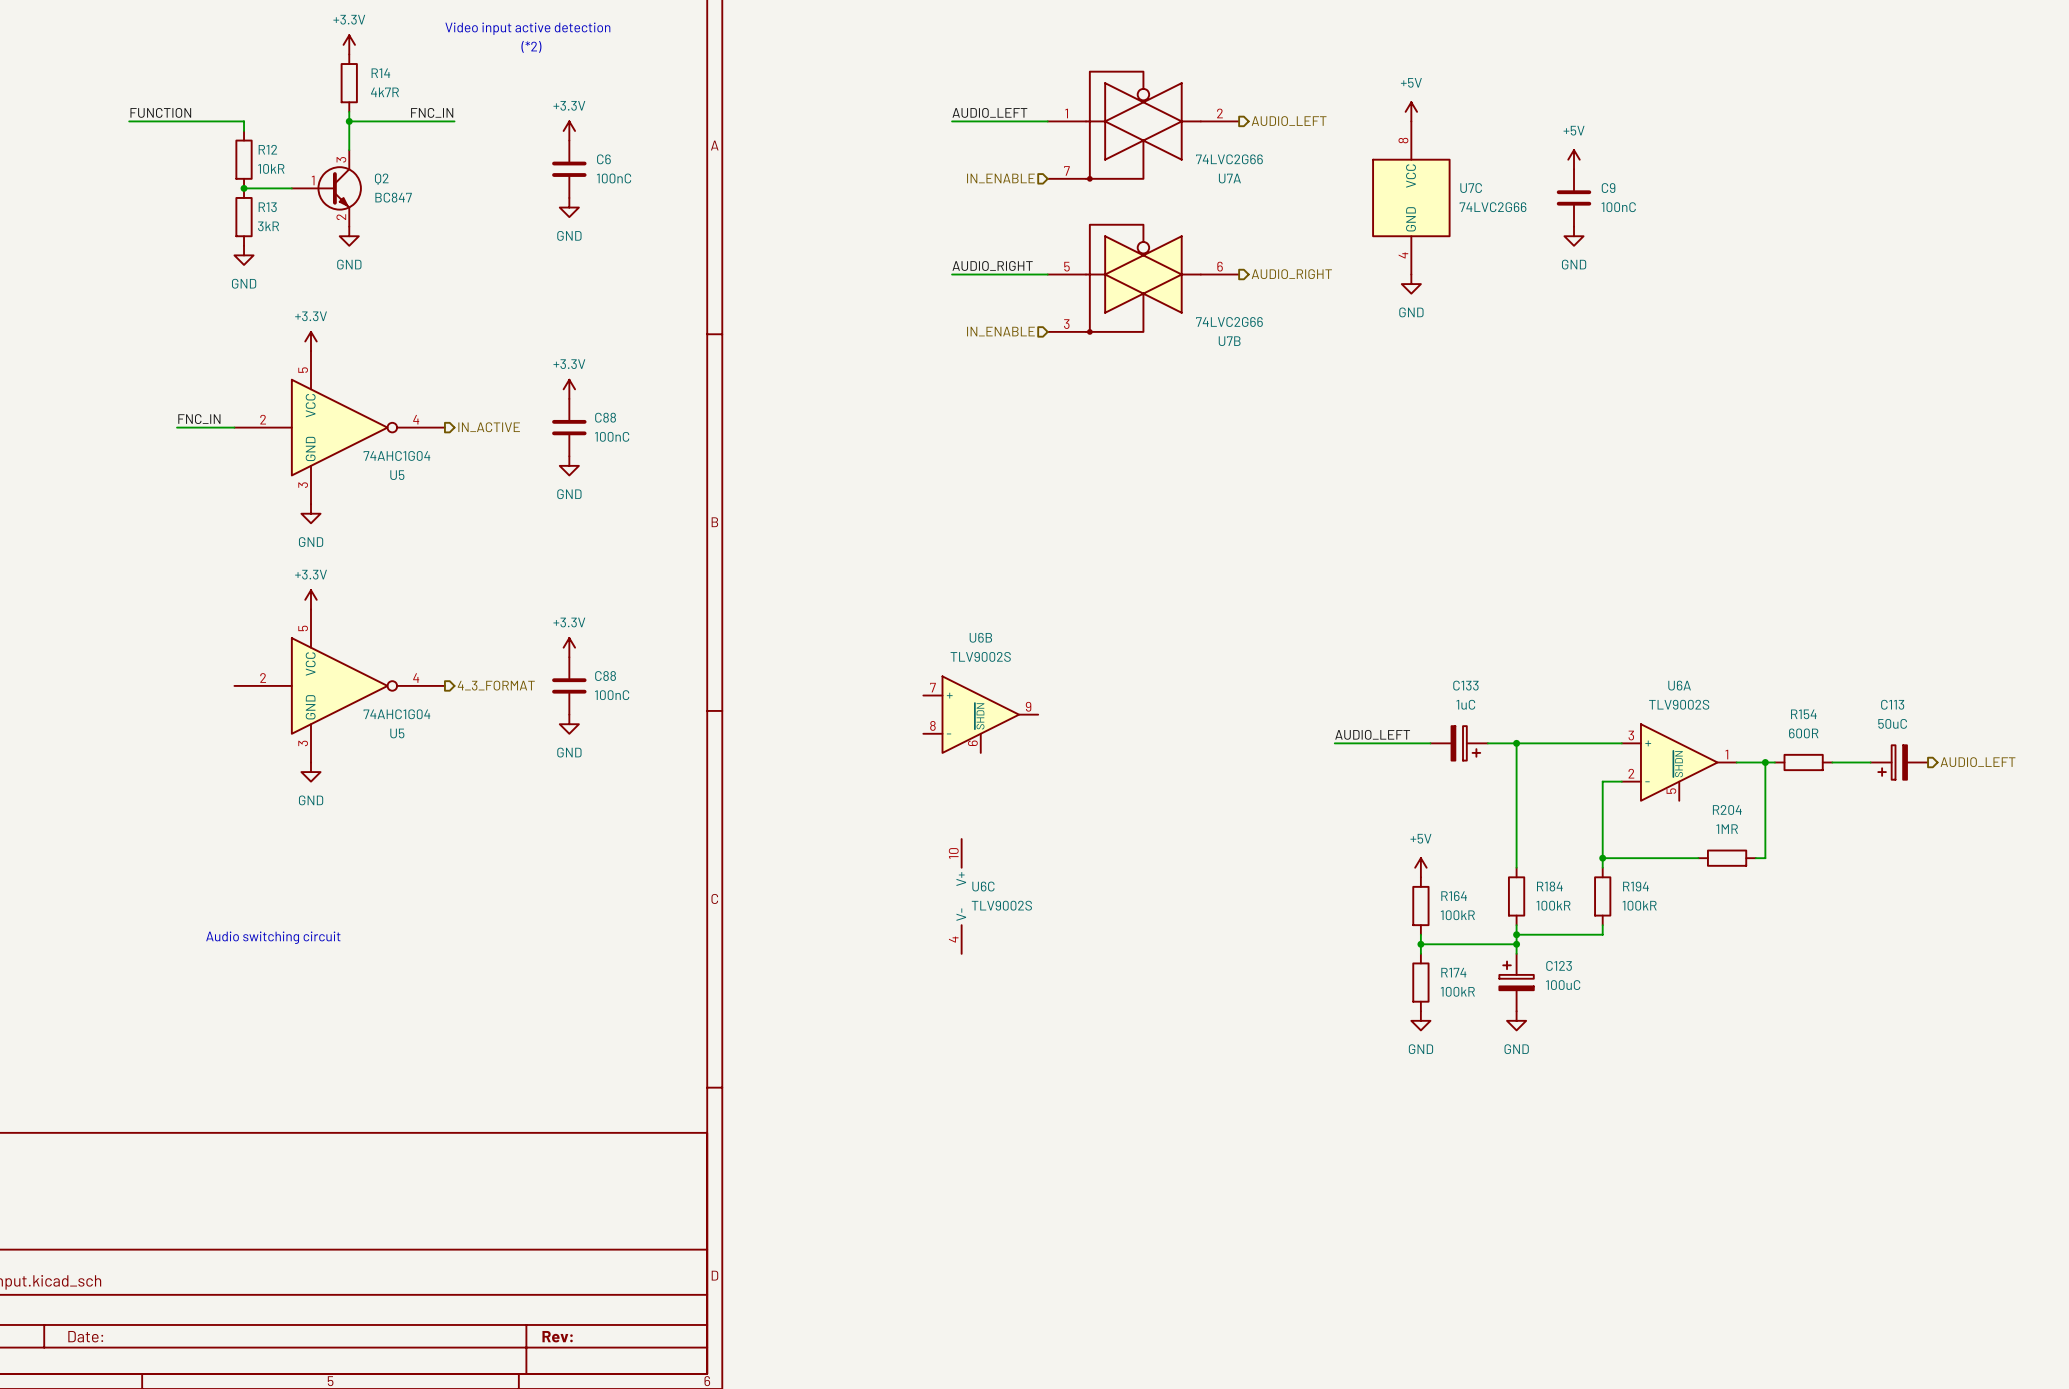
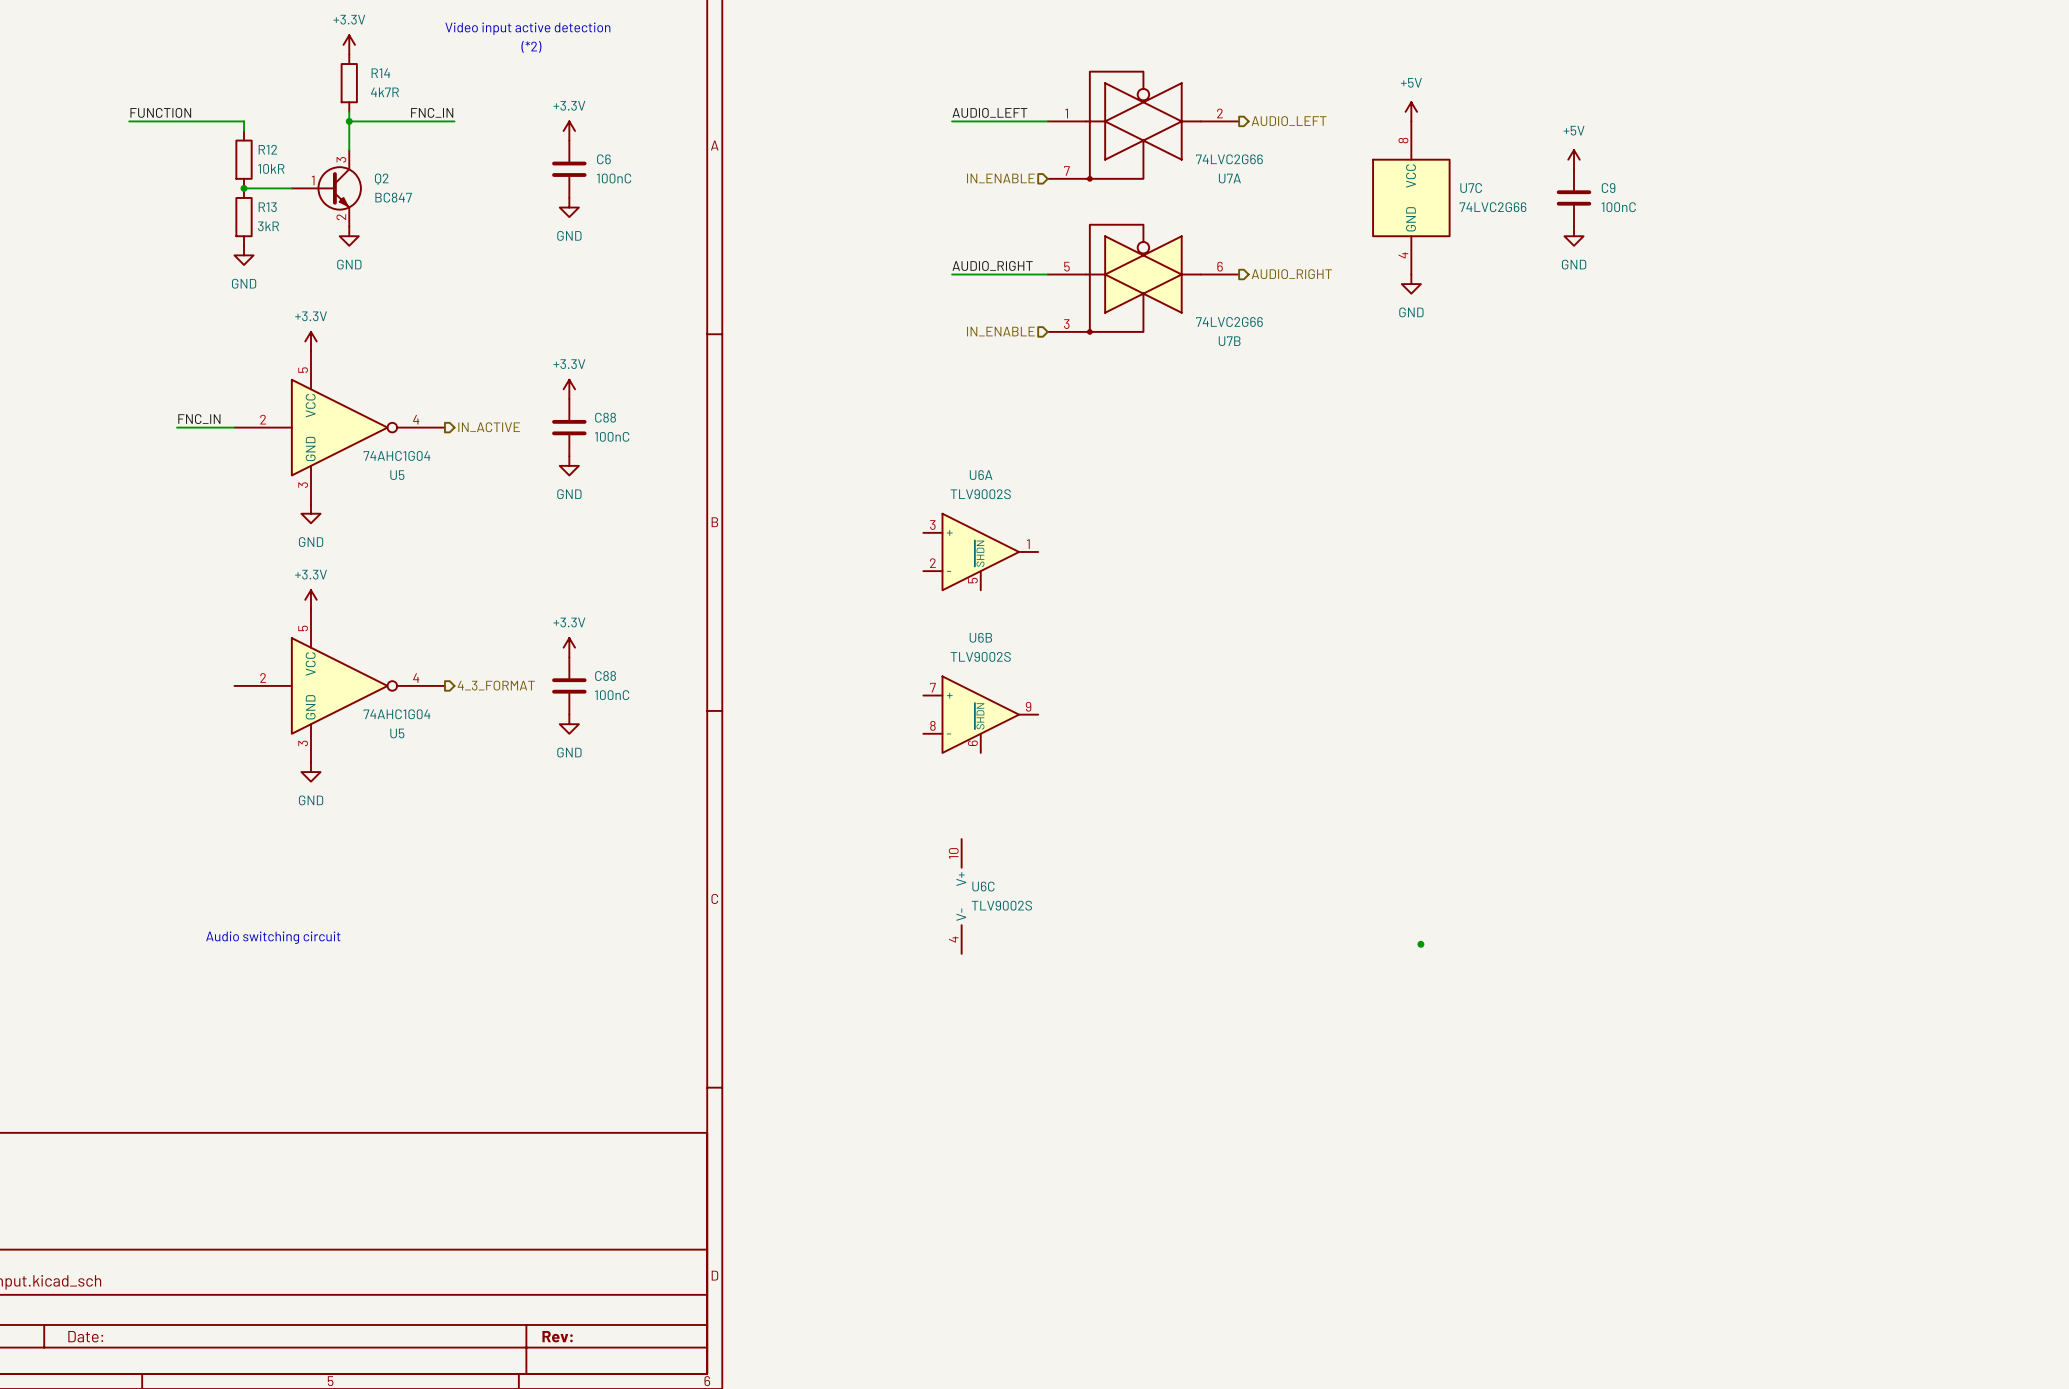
label: AUDIO_LEFT (1372, 734) -> none
wire: (1334, 743) (1430, 743) -> none
C133: 1uC (1459, 743) -> none
wire: (1487, 743) (1621, 743) -> none
wire: (1516, 743) (1516, 867) -> none
junction: (1516, 743) -> none
U6A position: (1679, 762) -> (980, 551)
wire: (1736, 762) (1774, 762) -> none
wire: (1765, 762) (1765, 858) (1755, 858) -> none
junction: (1765, 762) -> none
R154: 600R (1803, 762) -> none
wire: (1832, 762) (1870, 762) -> none
C113: 50uC (1899, 762) -> none
hierarchical label: AUDIO_LEFT (1978, 762) -> none
wire: (1621, 781) (1602, 781) (1602, 867) -> none
wire: (1602, 858) (1698, 858) -> none
junction: (1602, 858) -> none
R204: 1MR (1727, 858) -> none
power symbol: +5V (1420, 867) -> none
R184: 100kR (1516, 896) -> none
R194: 100kR (1602, 896) -> none
R164: 100kR (1420, 906) -> none
wire: (1516, 925) (1516, 953) -> none
wire: (1602, 925) (1602, 934) (1516, 934) -> none
wire: (1420, 934) (1420, 953) -> none
junction: (1516, 934) -> none
wire: (1420, 944) (1516, 944) -> none
junction: (1516, 944) -> none
R174: 100kR (1420, 982) -> none
C123: 100uC (1516, 982) -> none
power symbol: GND (1420, 1020) -> none
power symbol: GND (1516, 1020) -> none

